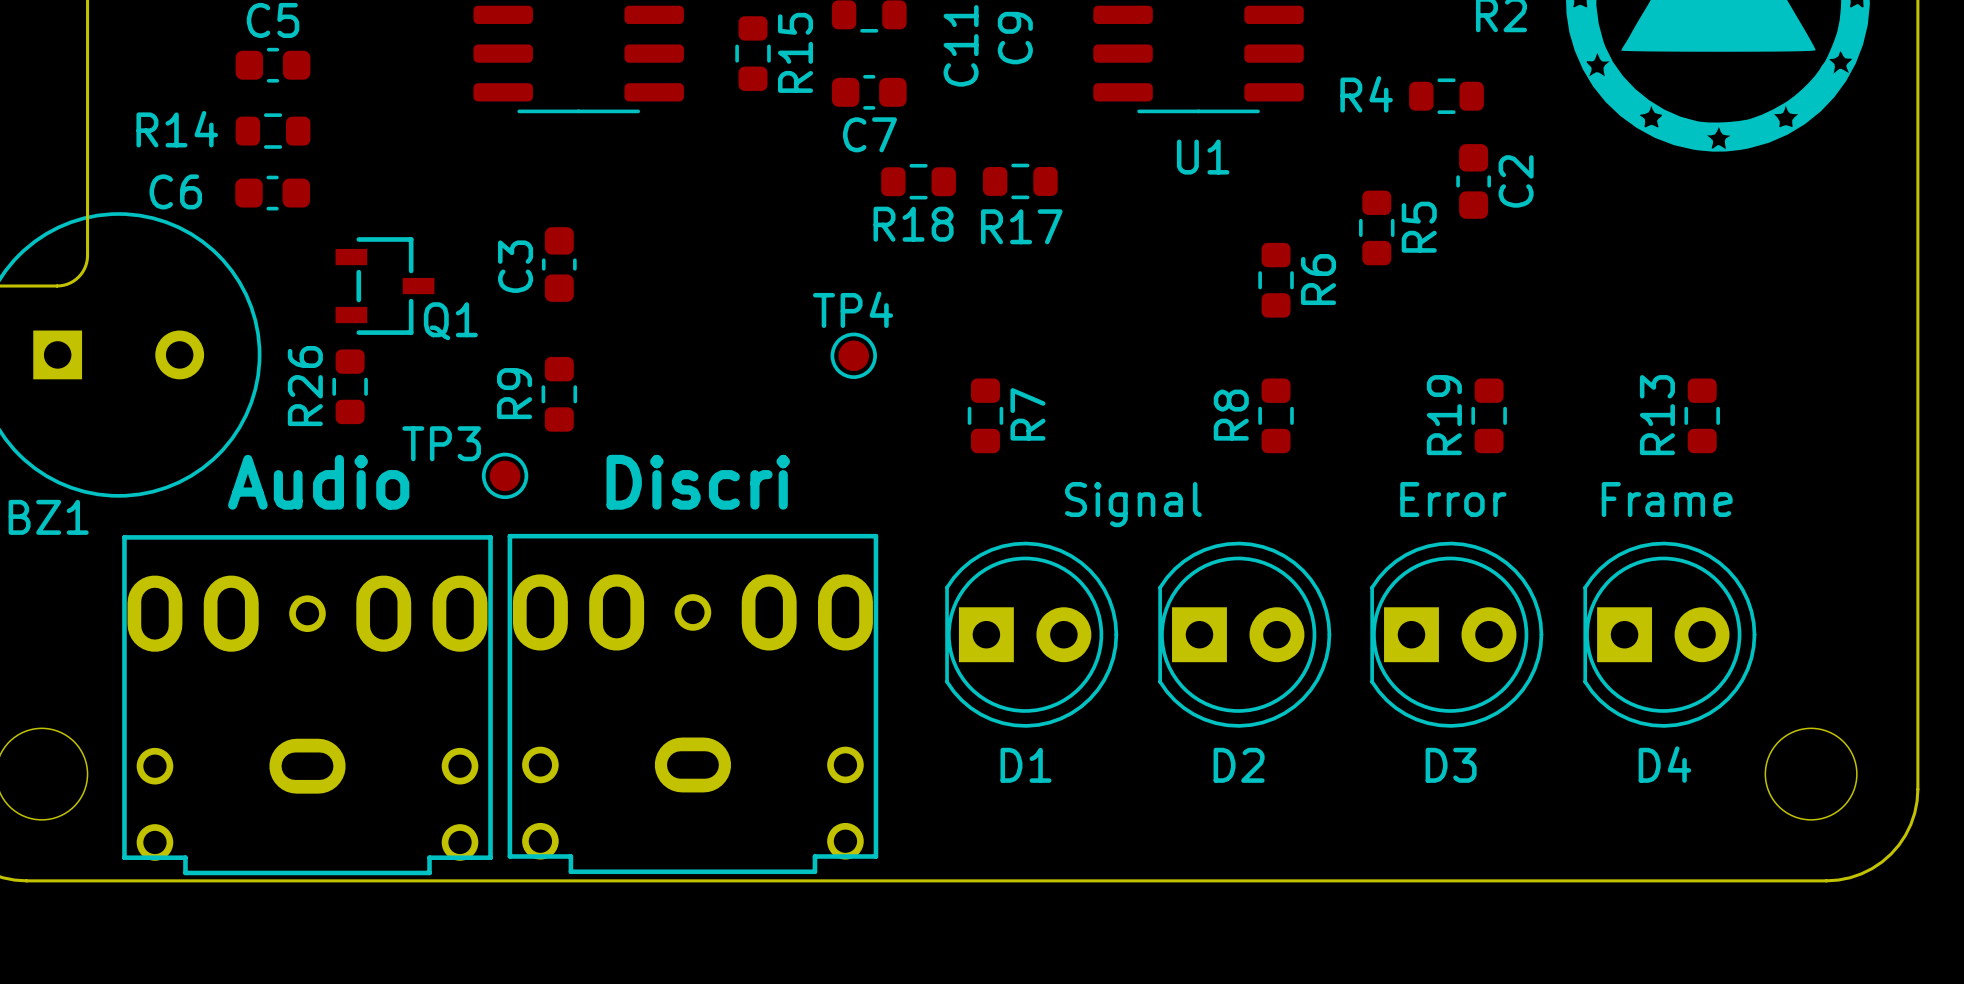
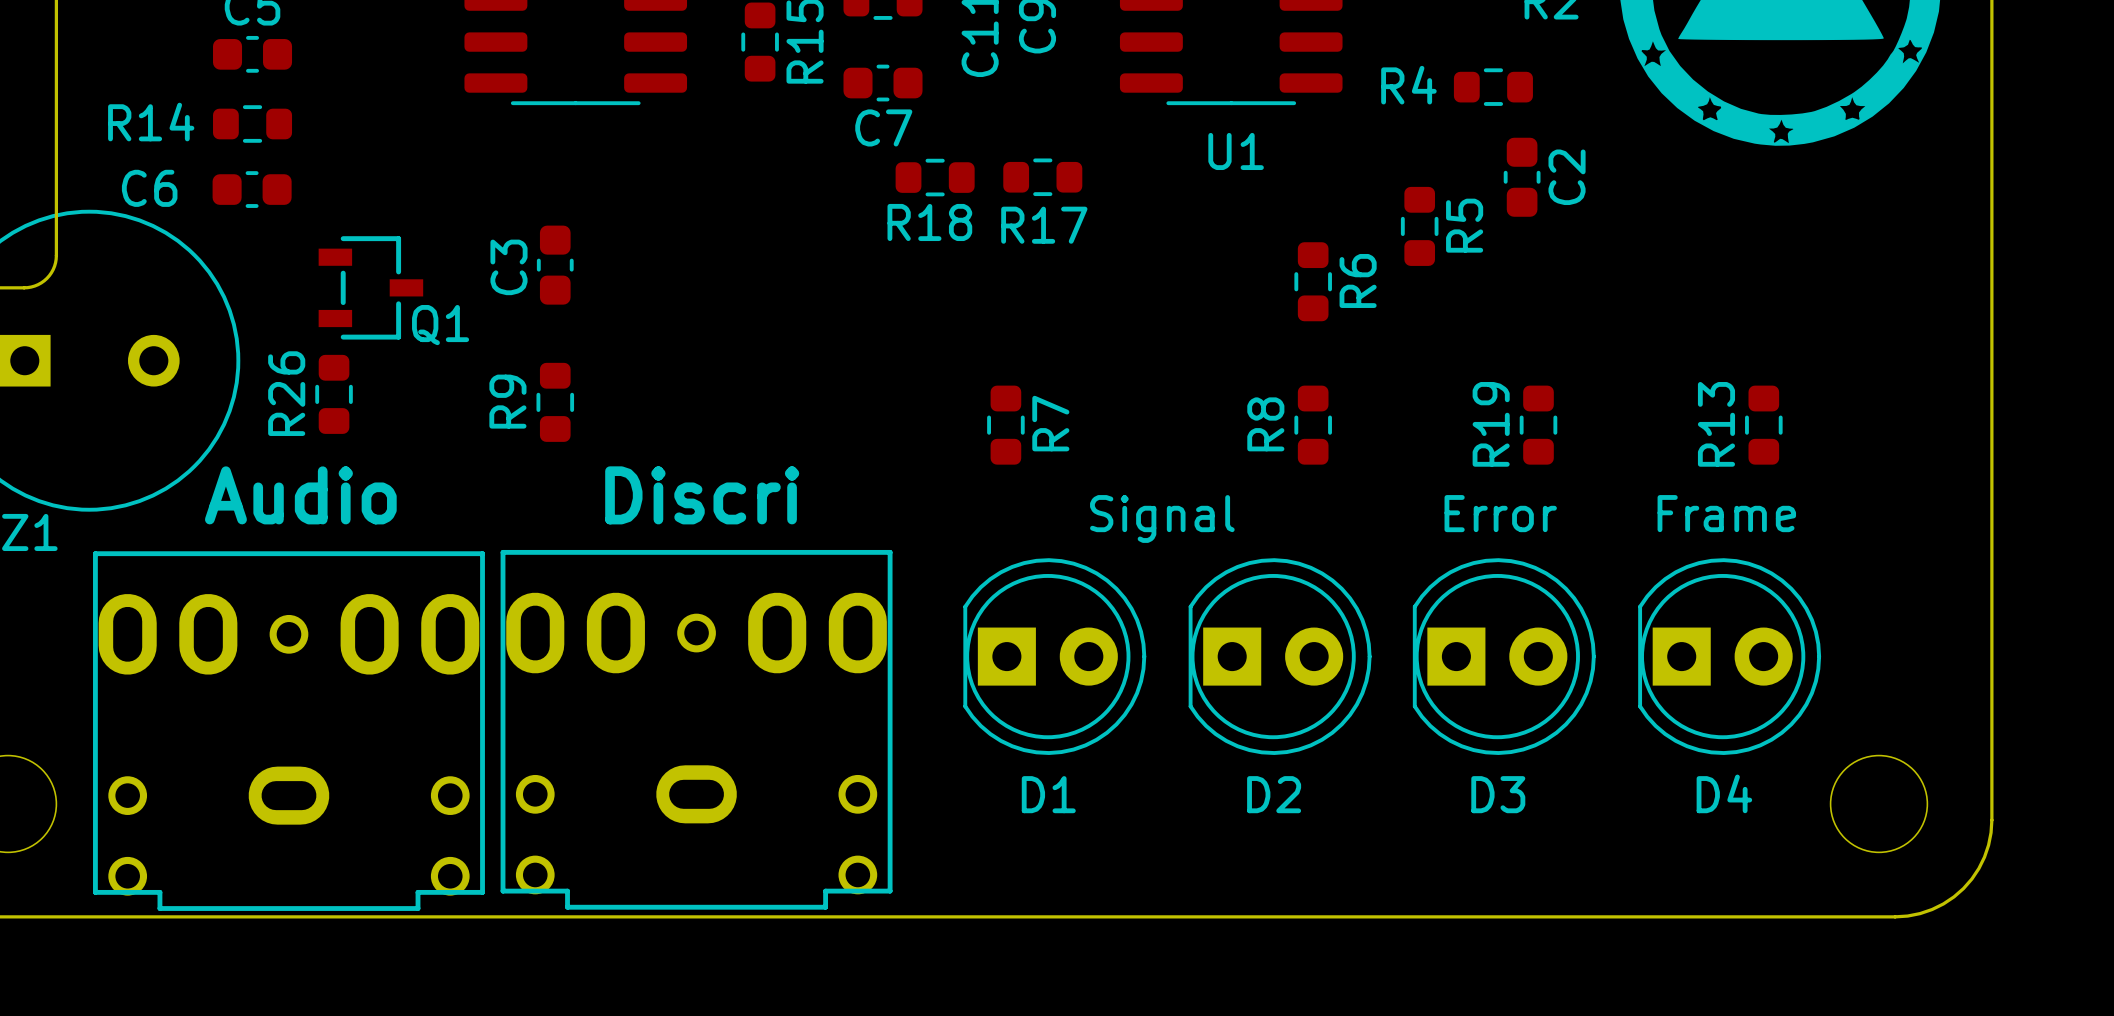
TP4: (853, 355) -> none
TP3: (505, 475) -> none

